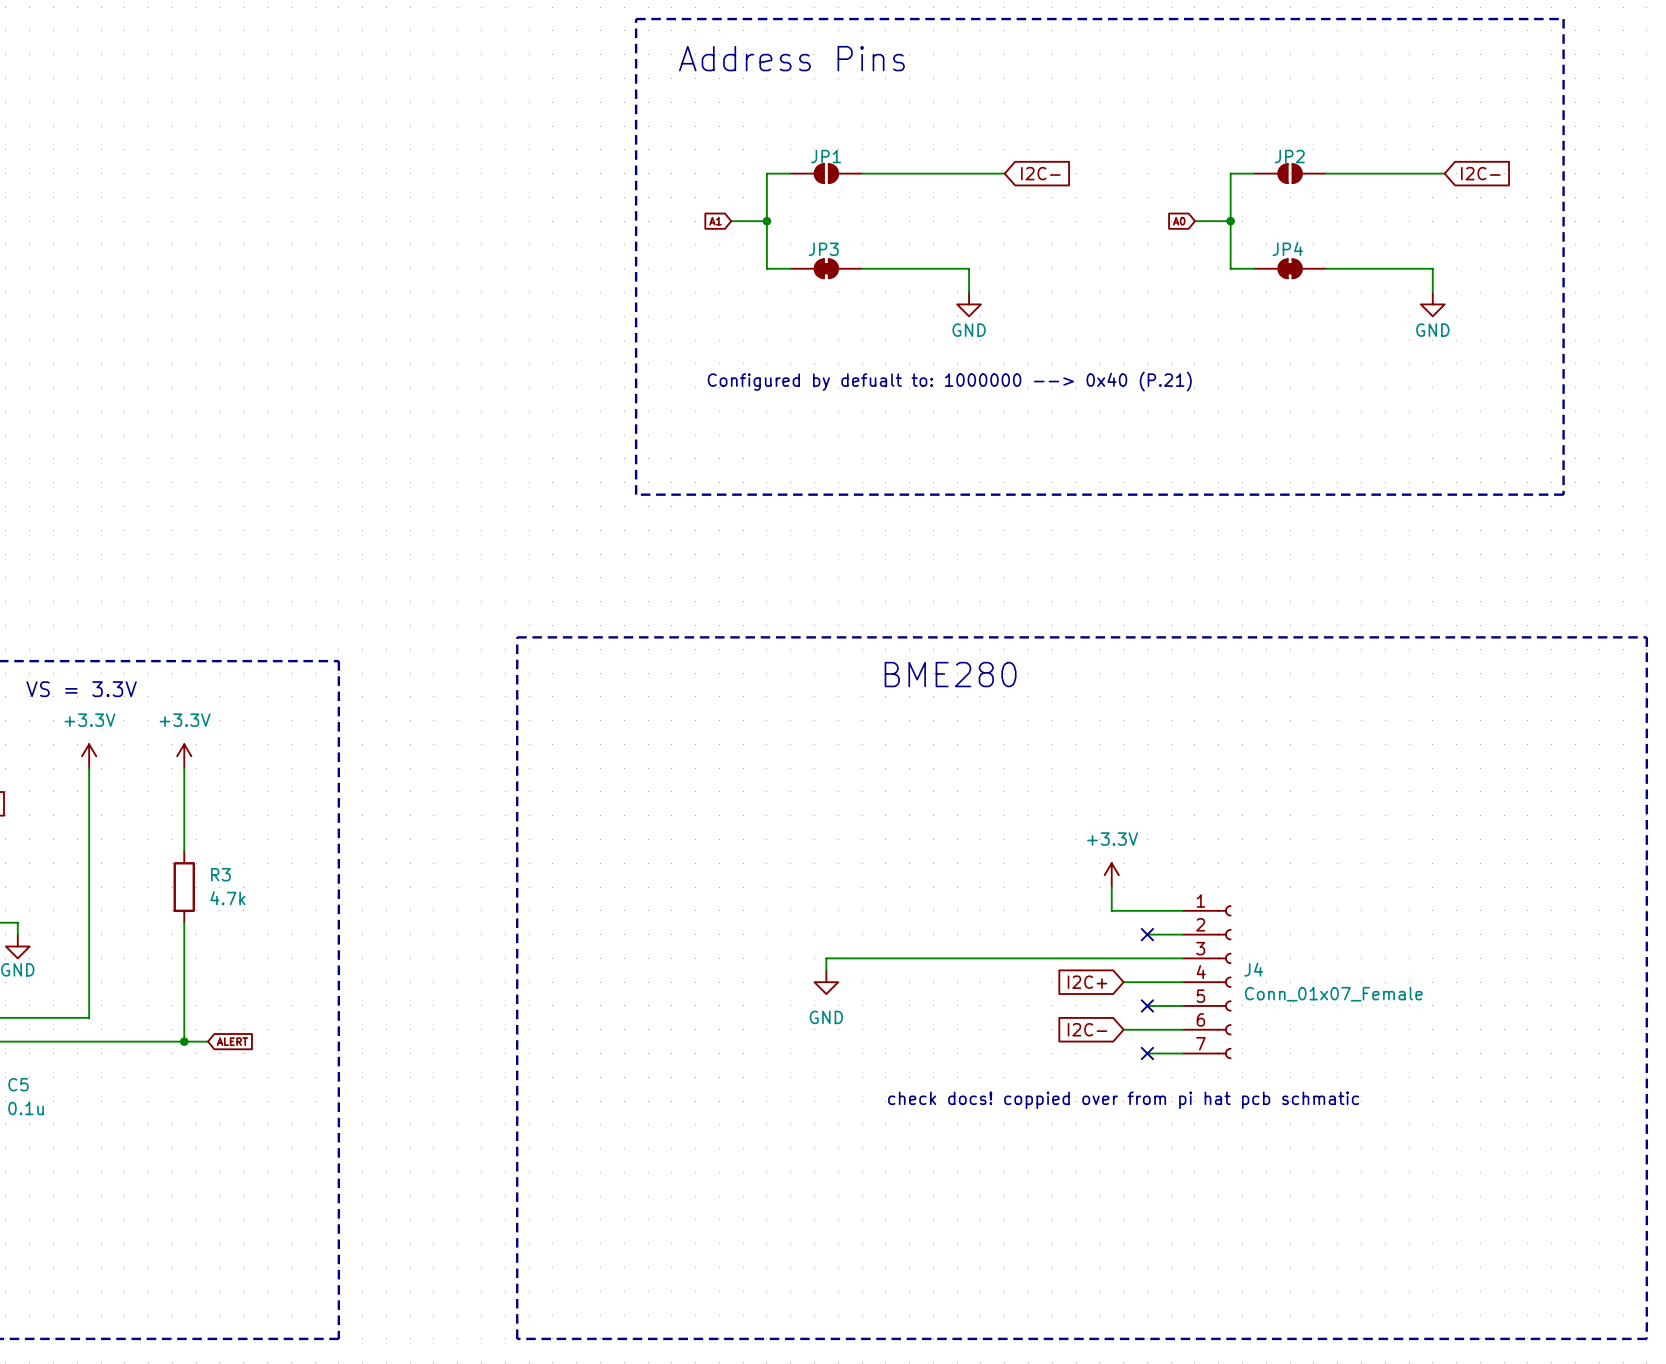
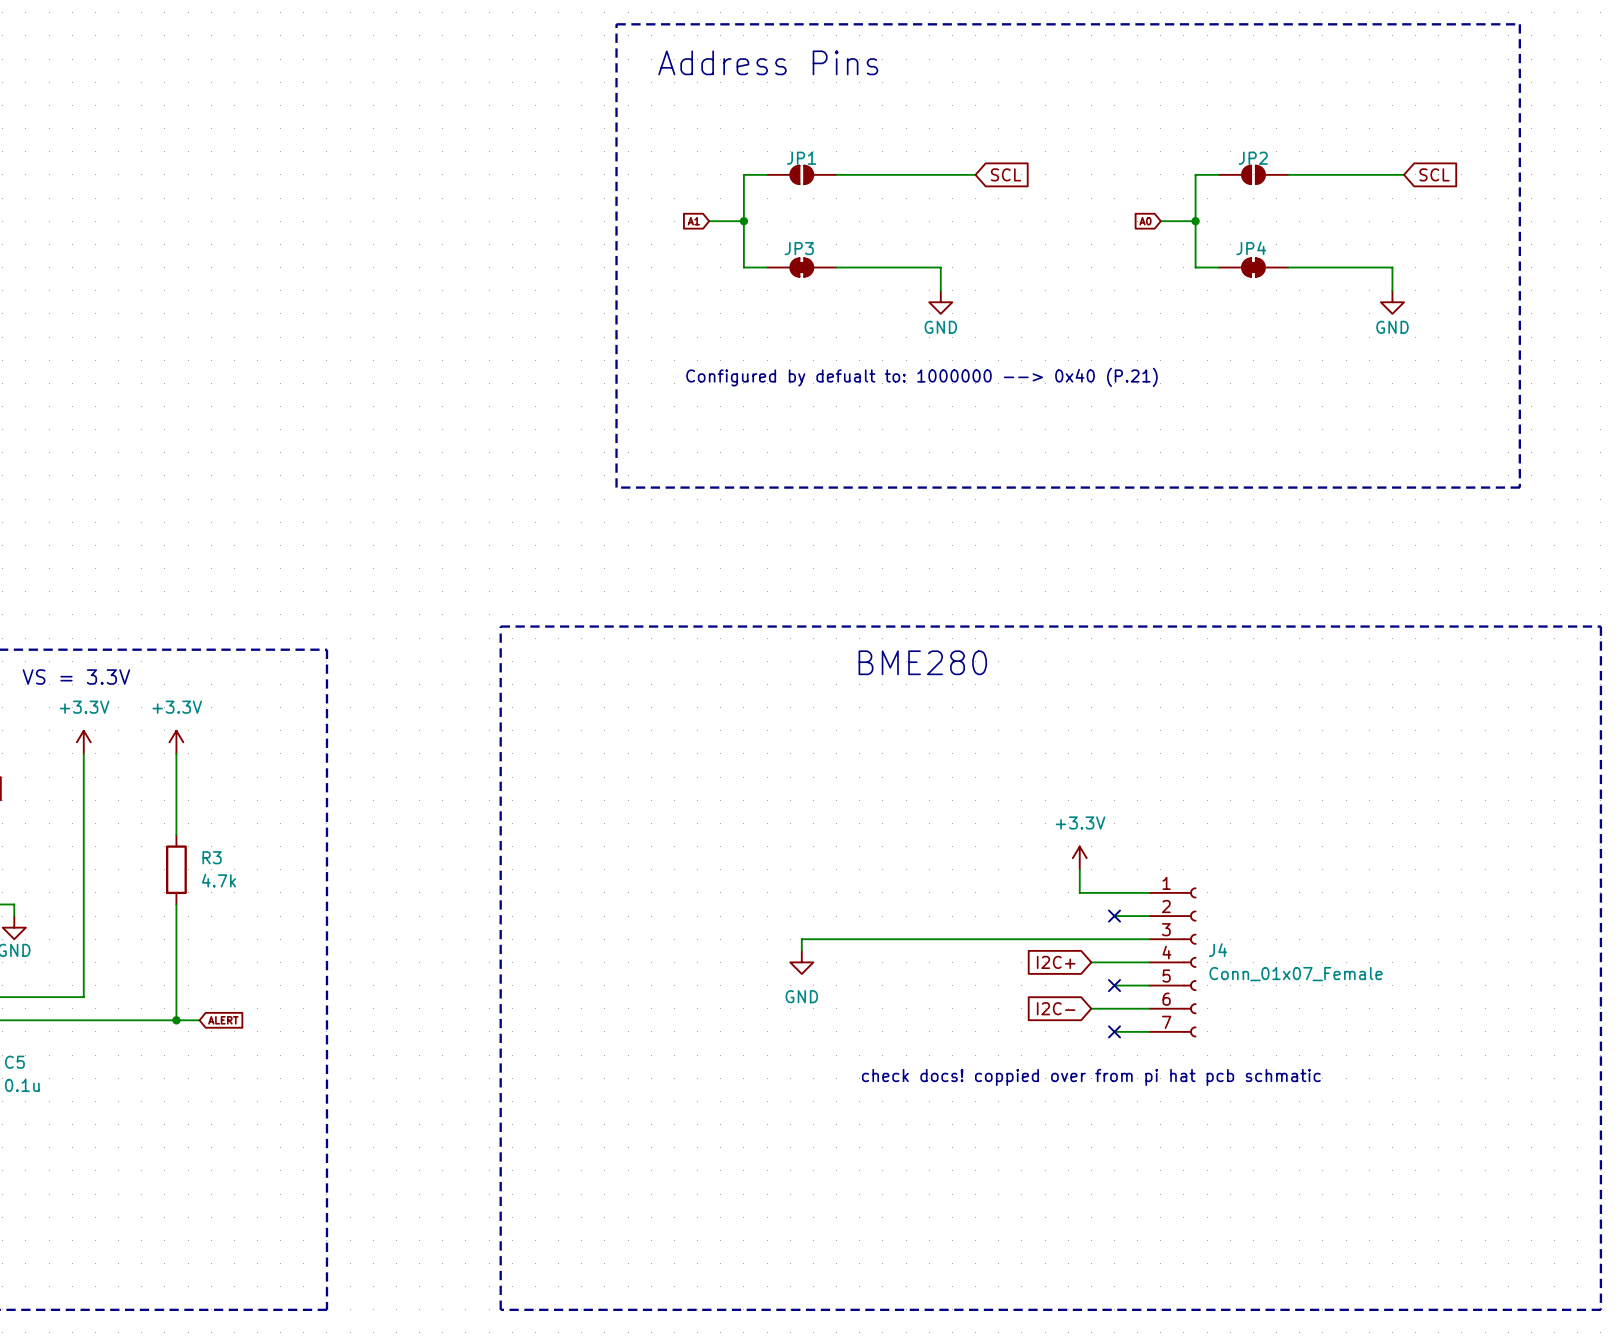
global label: I2C- (1040, 173) -> SCL (1006, 174)
global label: I2C- (1480, 173) -> SCL (1434, 174)

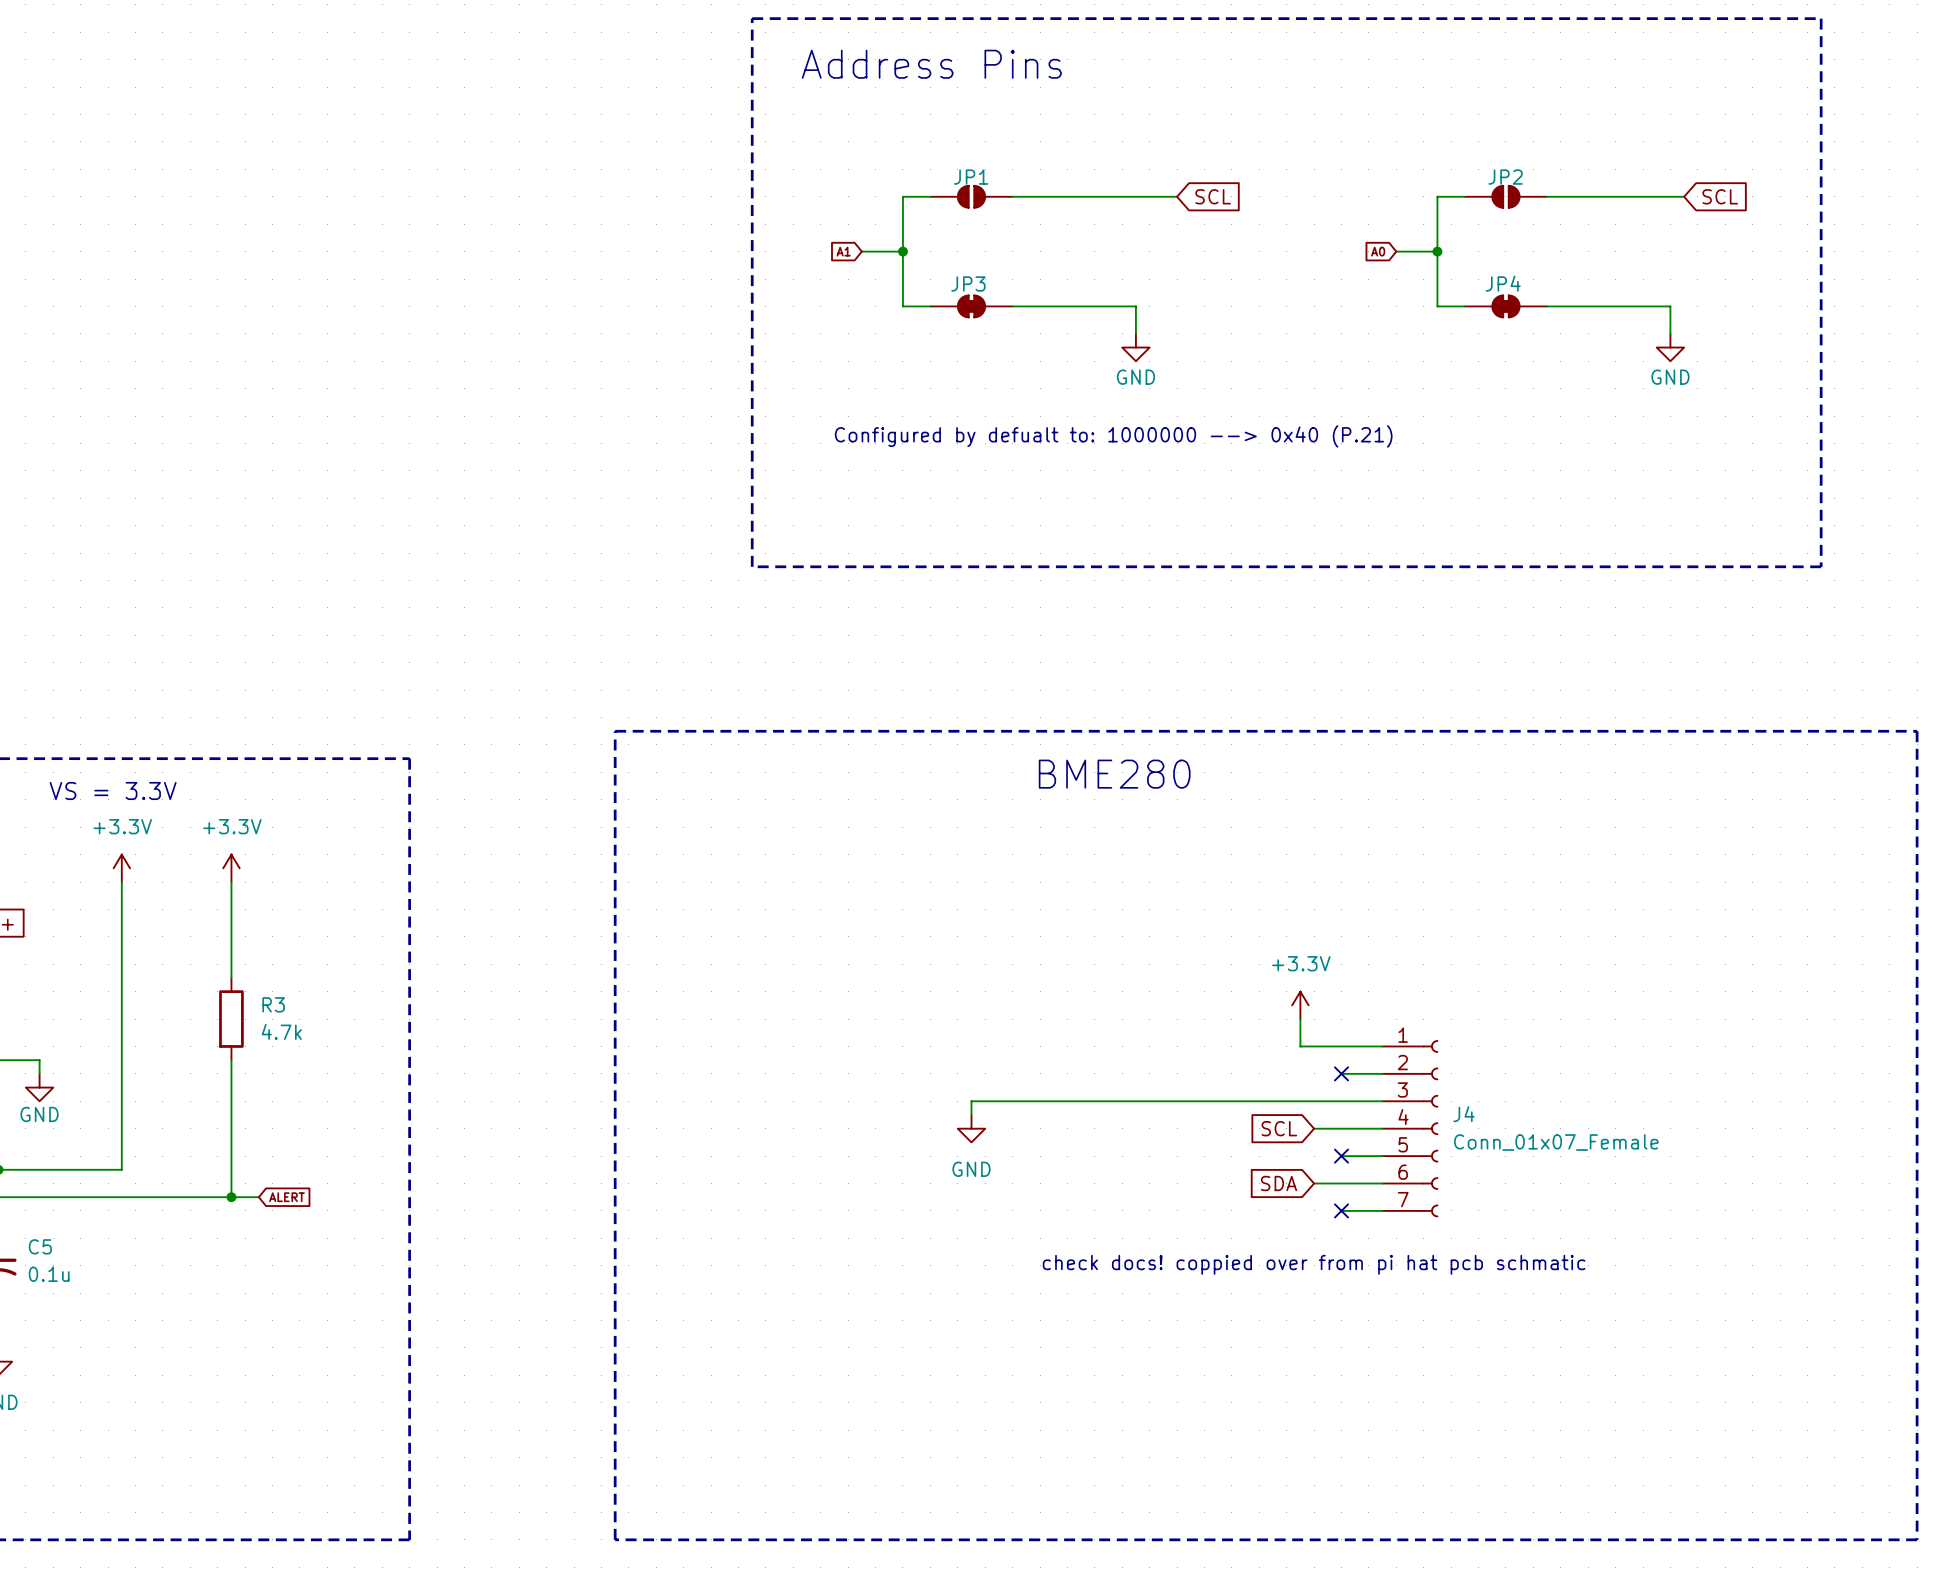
global label: I2C+ (1056, 962) -> SCL (1279, 1128)
global label: I2C- (1056, 1008) -> SDA (1279, 1183)

